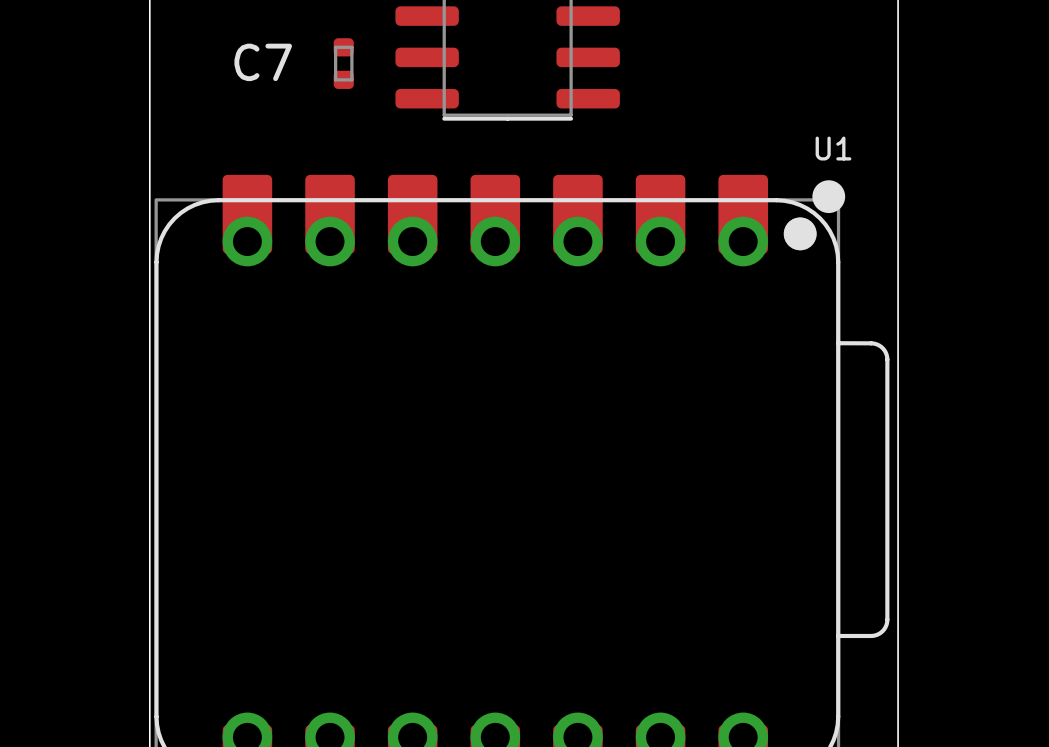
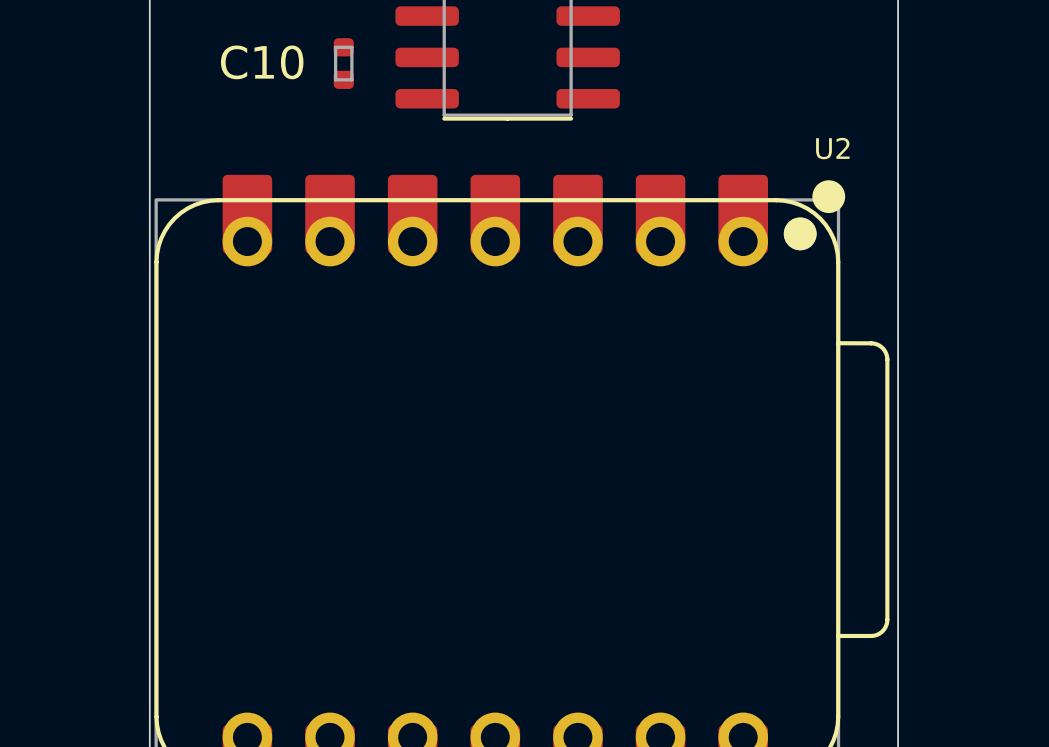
C7 name: C7 (263, 62) -> C10 (262, 62)
U1 name: U1 (833, 148) -> U2 (832, 148)

